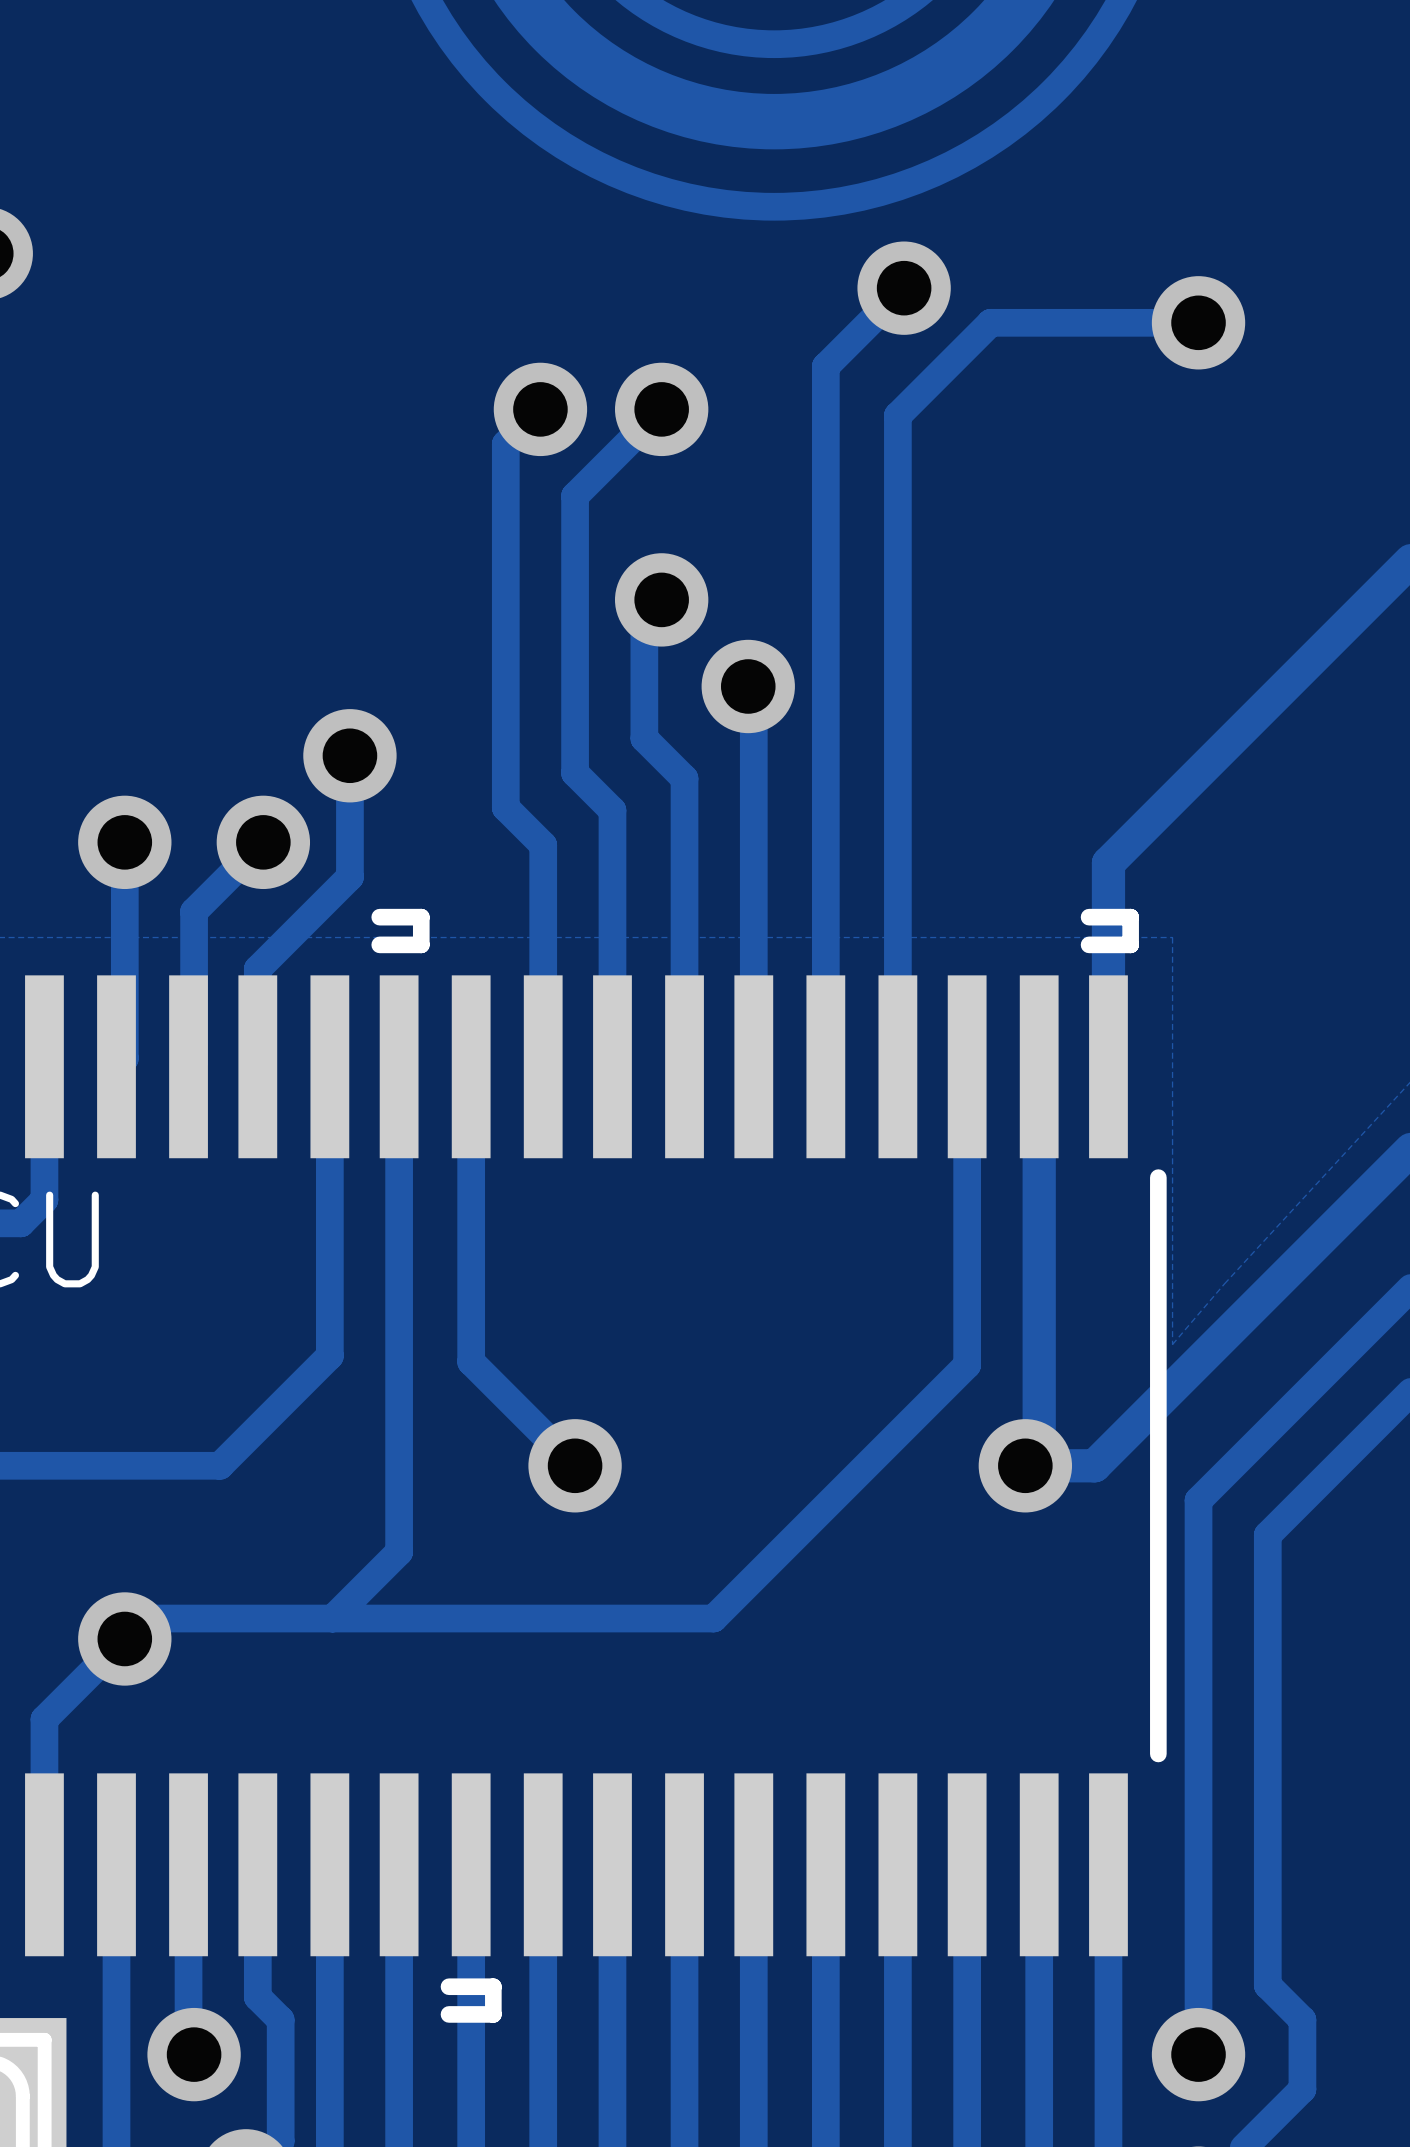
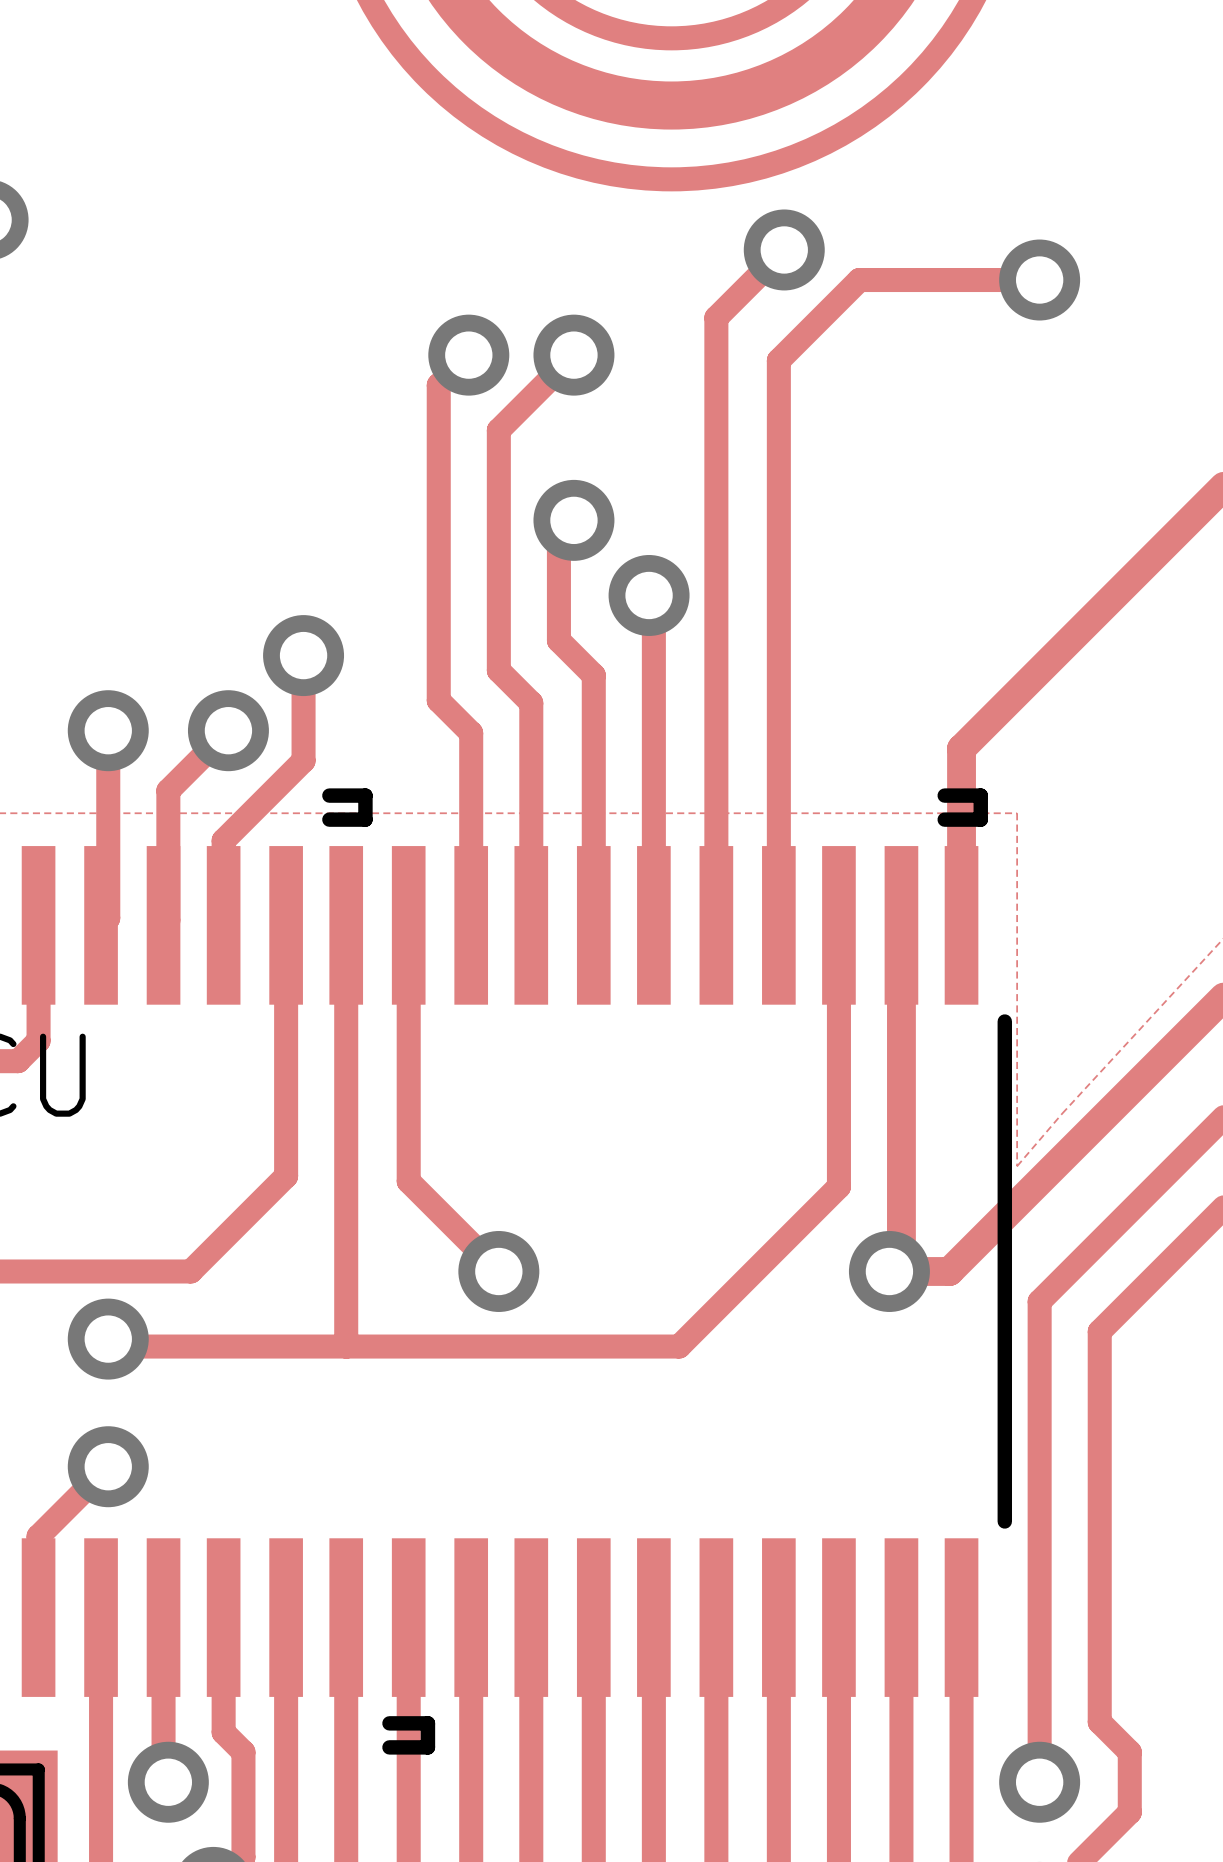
track: (967, 1364) (713, 1618) (145, 1618) (44, 1719) (44, 1771) -> (838, 1184) (838, 1186) (679, 1346) (115, 1346) (108, 1339)
via: none -> (108, 1339)
track: (399, 1552) (332, 1618) -> none
via position: (124, 1638) -> (108, 1466)
track: none -> (108, 1466) (38, 1536)

